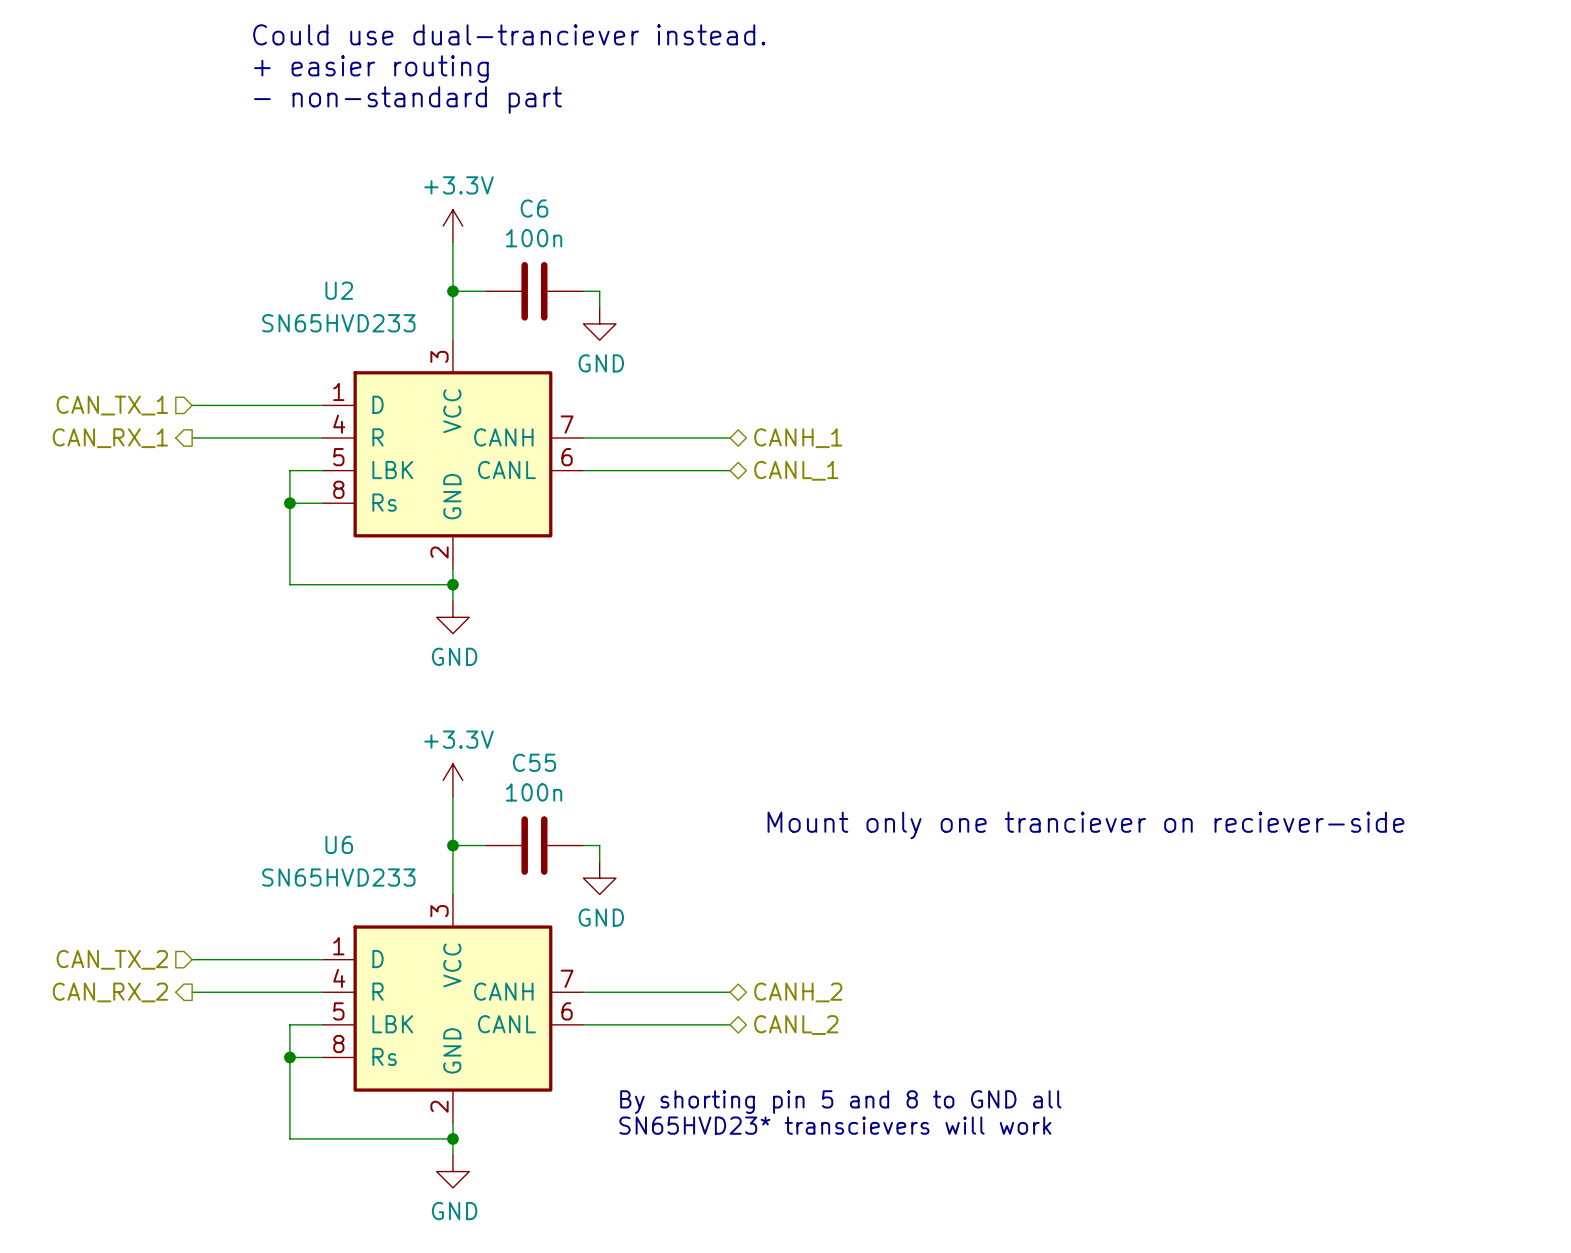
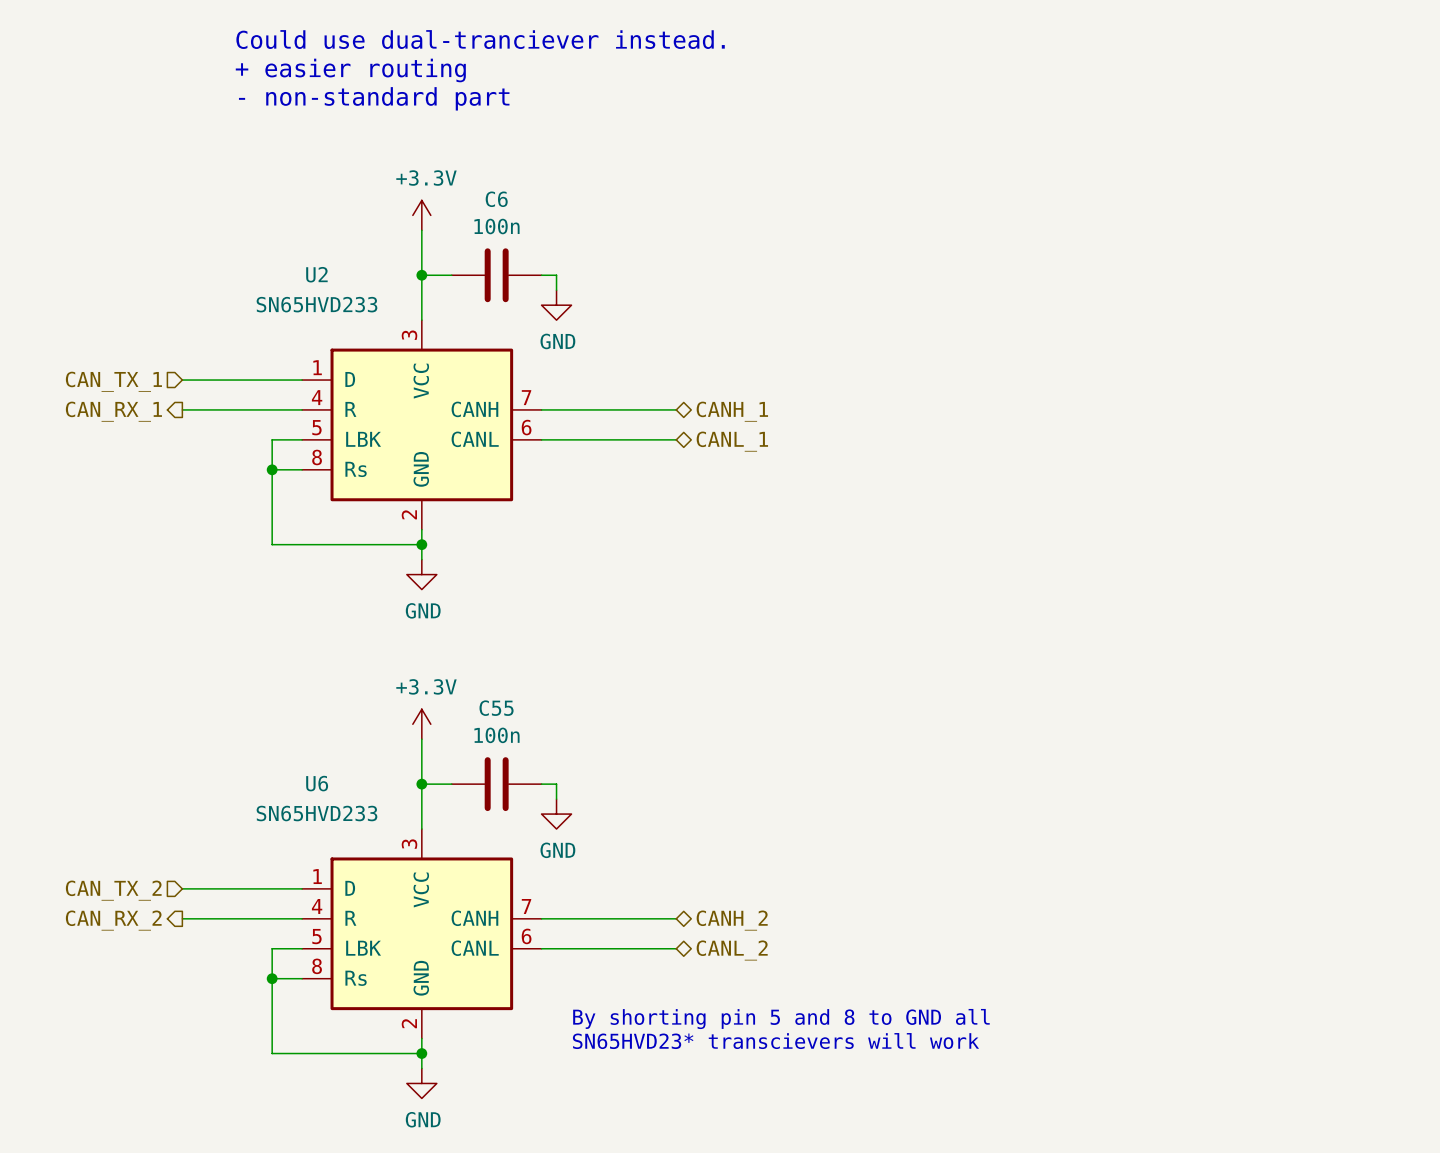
text: Mount only one tranciever on reciever-side (1085, 825) -> none

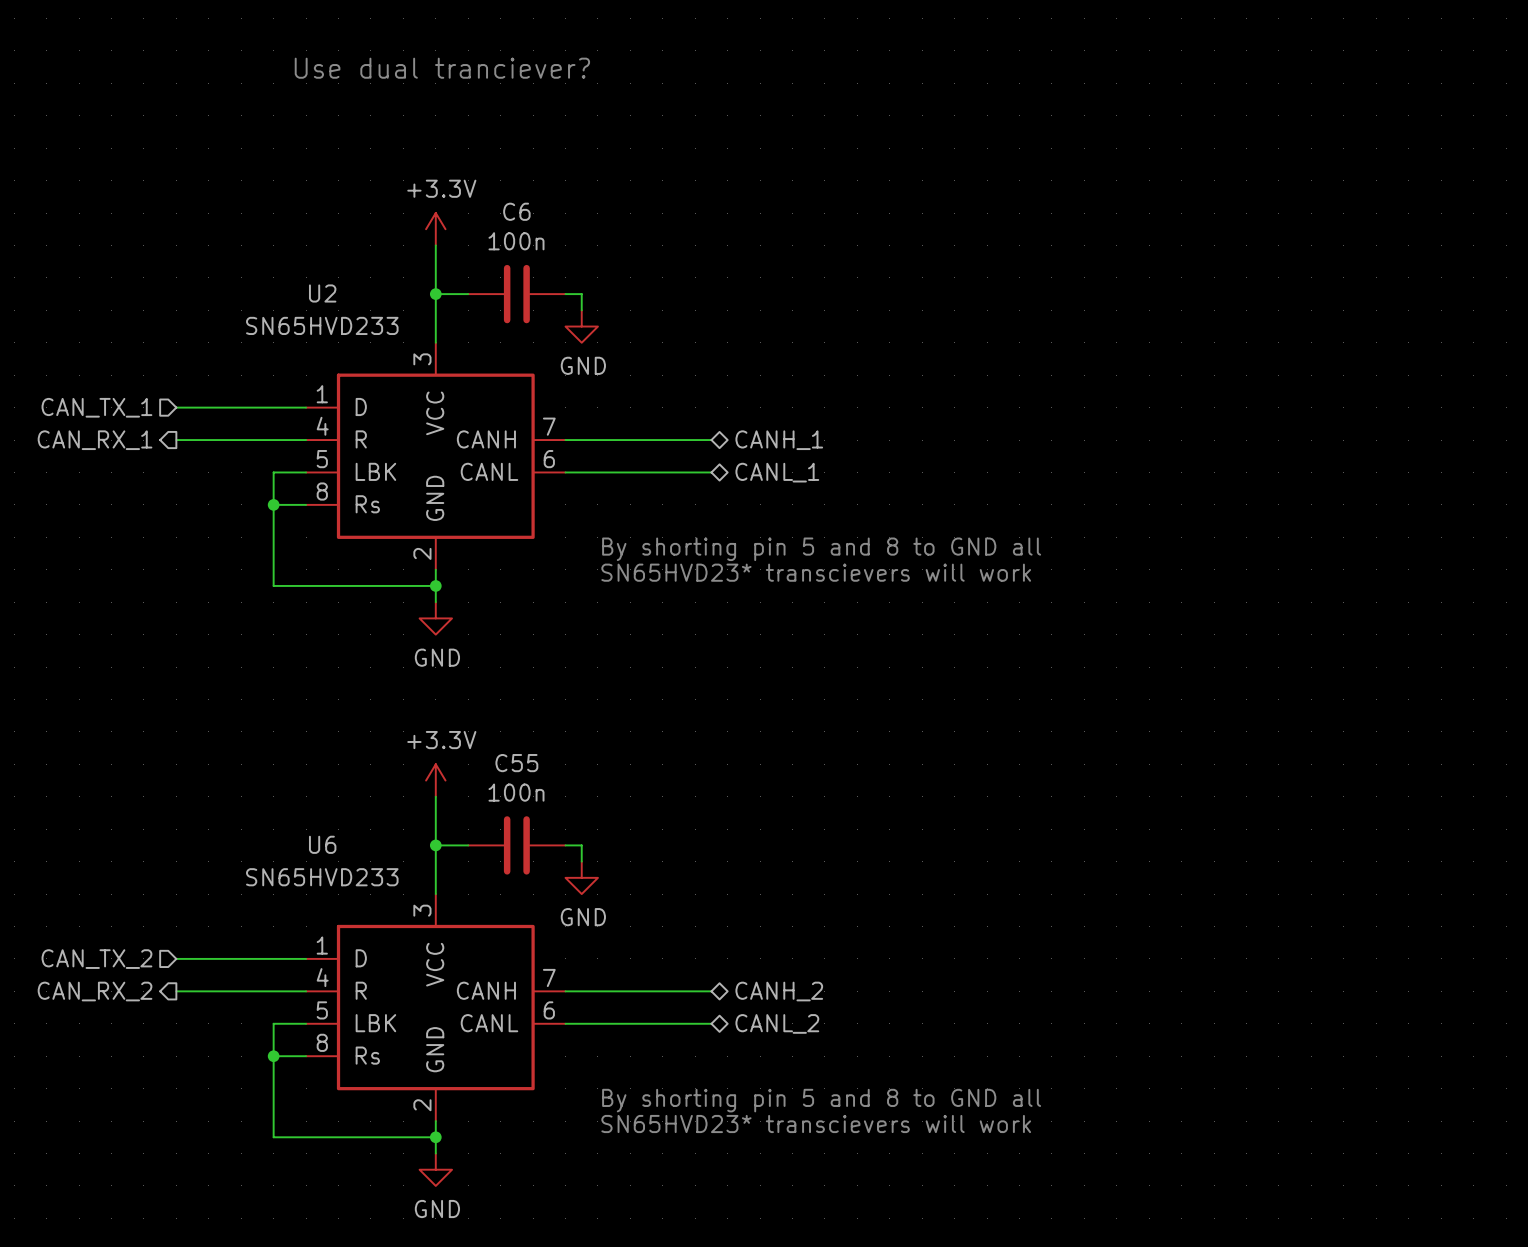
text: Could use dual-tranciever instead. (480, 39) -> Use dual tranciever? (442, 68)
text: + easier routing (350, 70) -> none
text: - non-standard part (374, 98) -> none
text: none -> By shorting pin 5 and 8 to GND all (821, 549)
text: none -> SN65HVD23* transcievers will work (816, 572)

